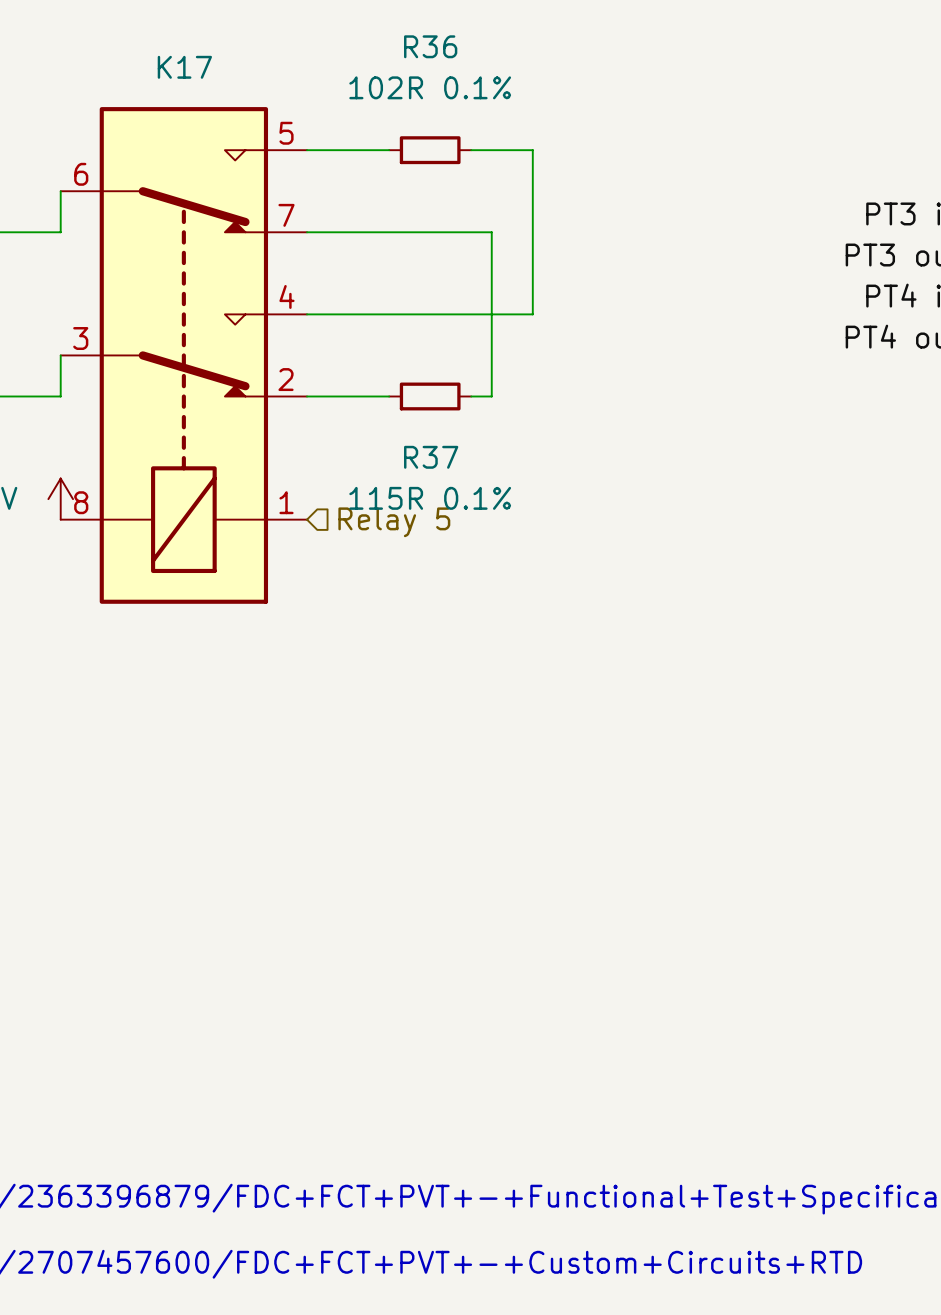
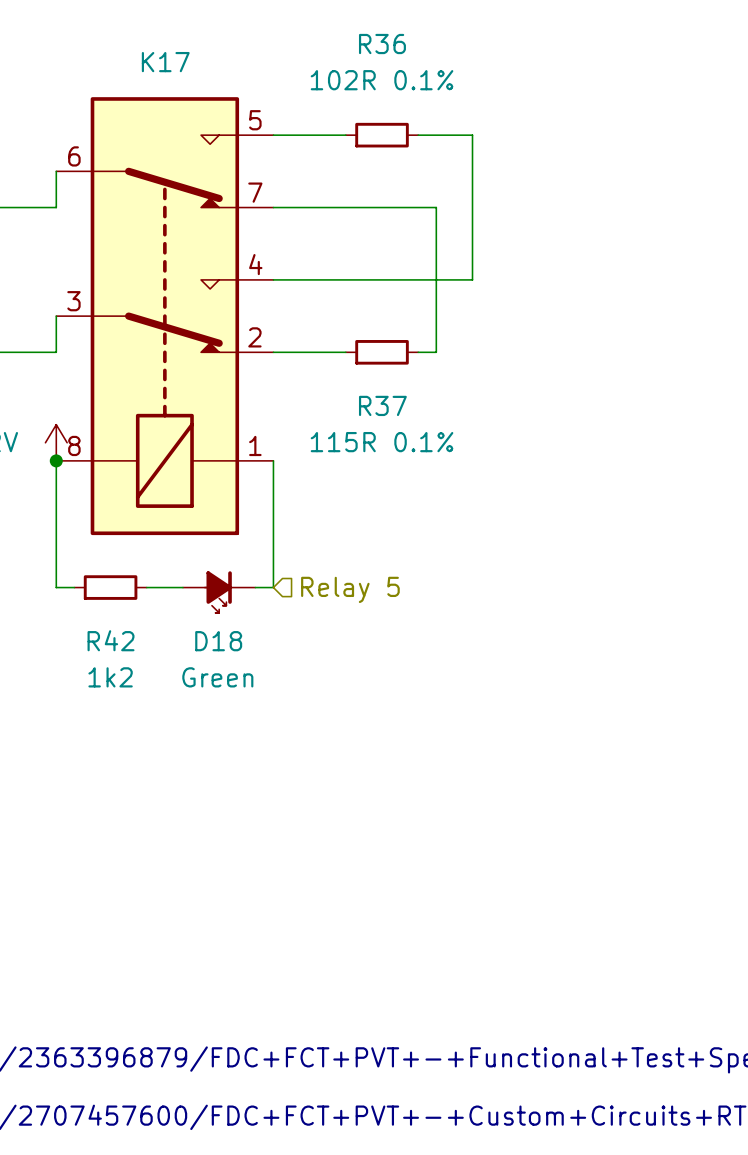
wire: none -> (56, 460) (56, 587) (74, 587)
junction: none -> (56, 460)
wire: none -> (273, 460) (273, 587) (255, 587)
hierarchical label position: Relay 5 (394, 522) -> Relay 5 (350, 589)
R42: none -> 1k2 (110, 587)
wire: none -> (146, 587) (182, 587)
D18: none -> Green (219, 592)

